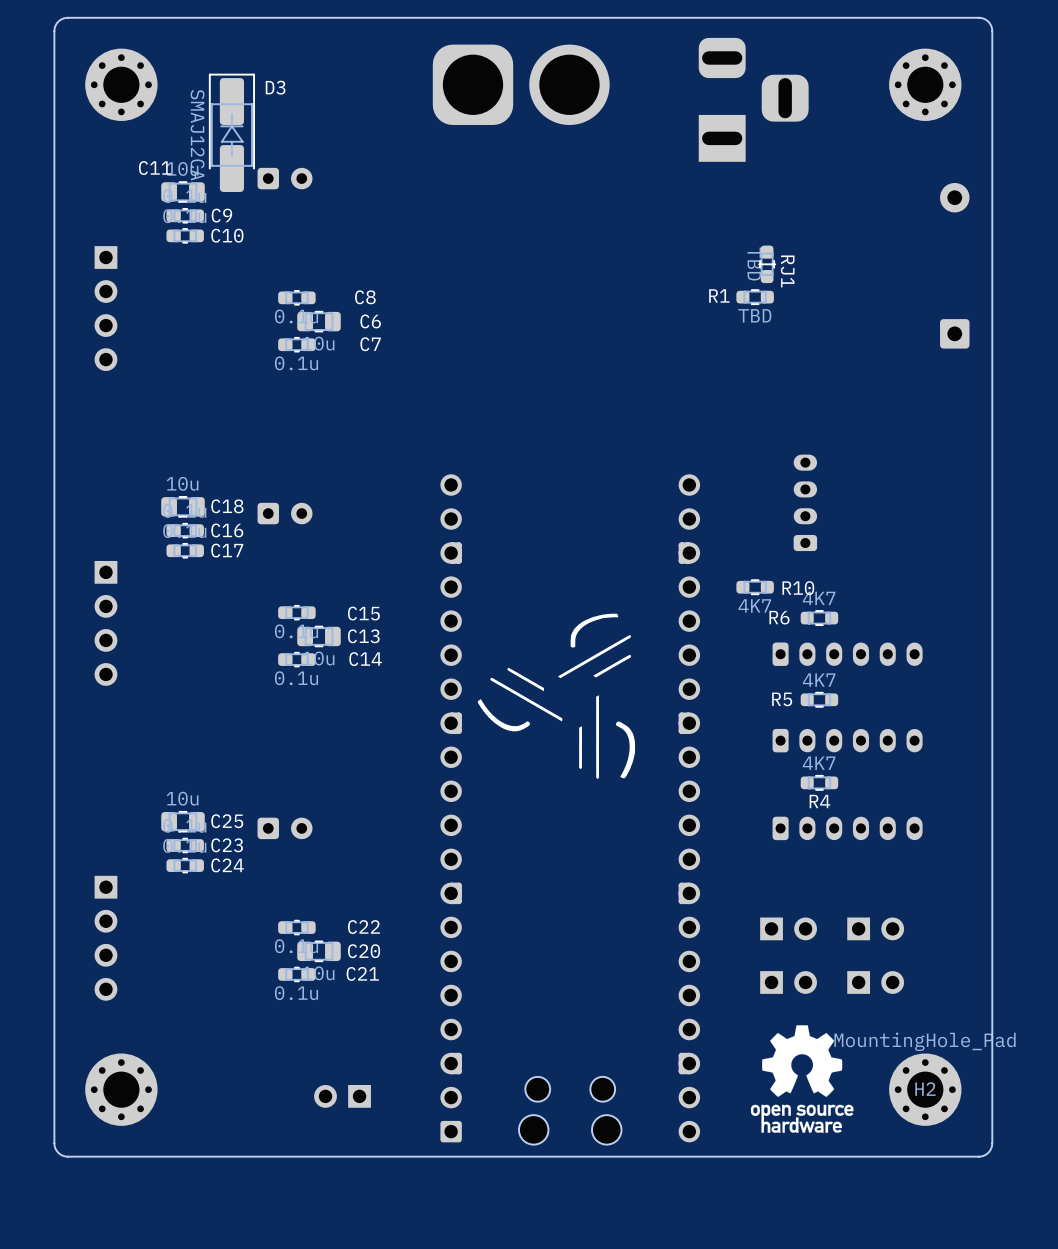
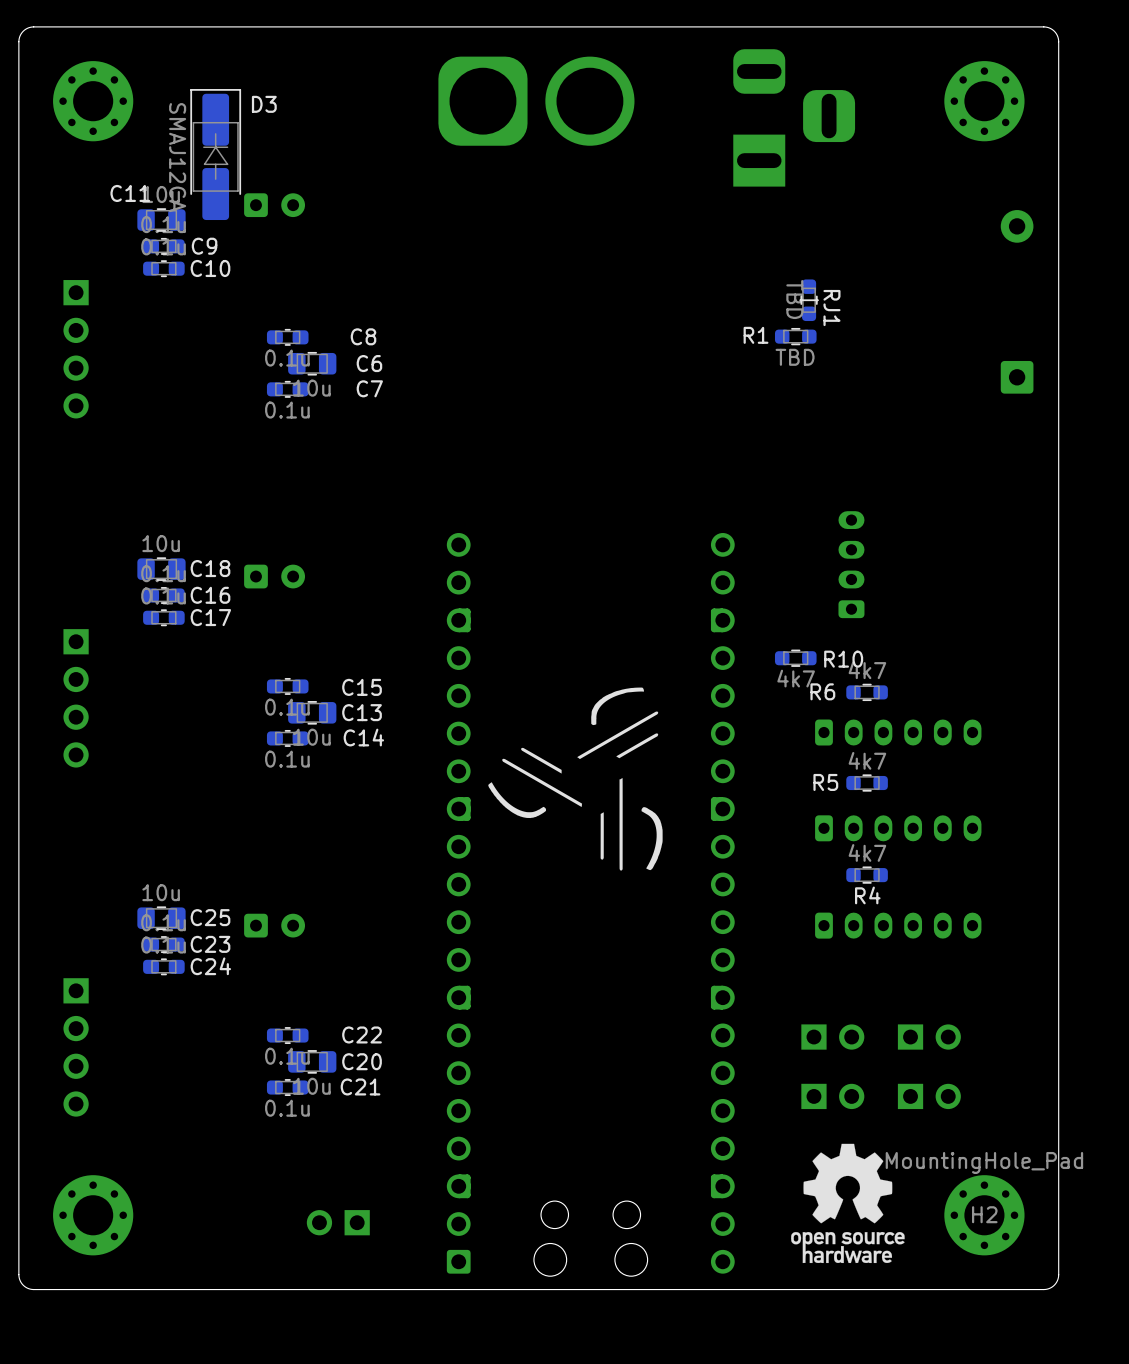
R6 value: 4K7 (819, 598) -> 4k7 (867, 670)
R10 value: 4K7 (754, 605) -> 4k7 (796, 678)
R5 value: 4K7 (819, 680) -> 4k7 (867, 760)
R4 value: 4K7 (819, 763) -> 4k7 (867, 852)

